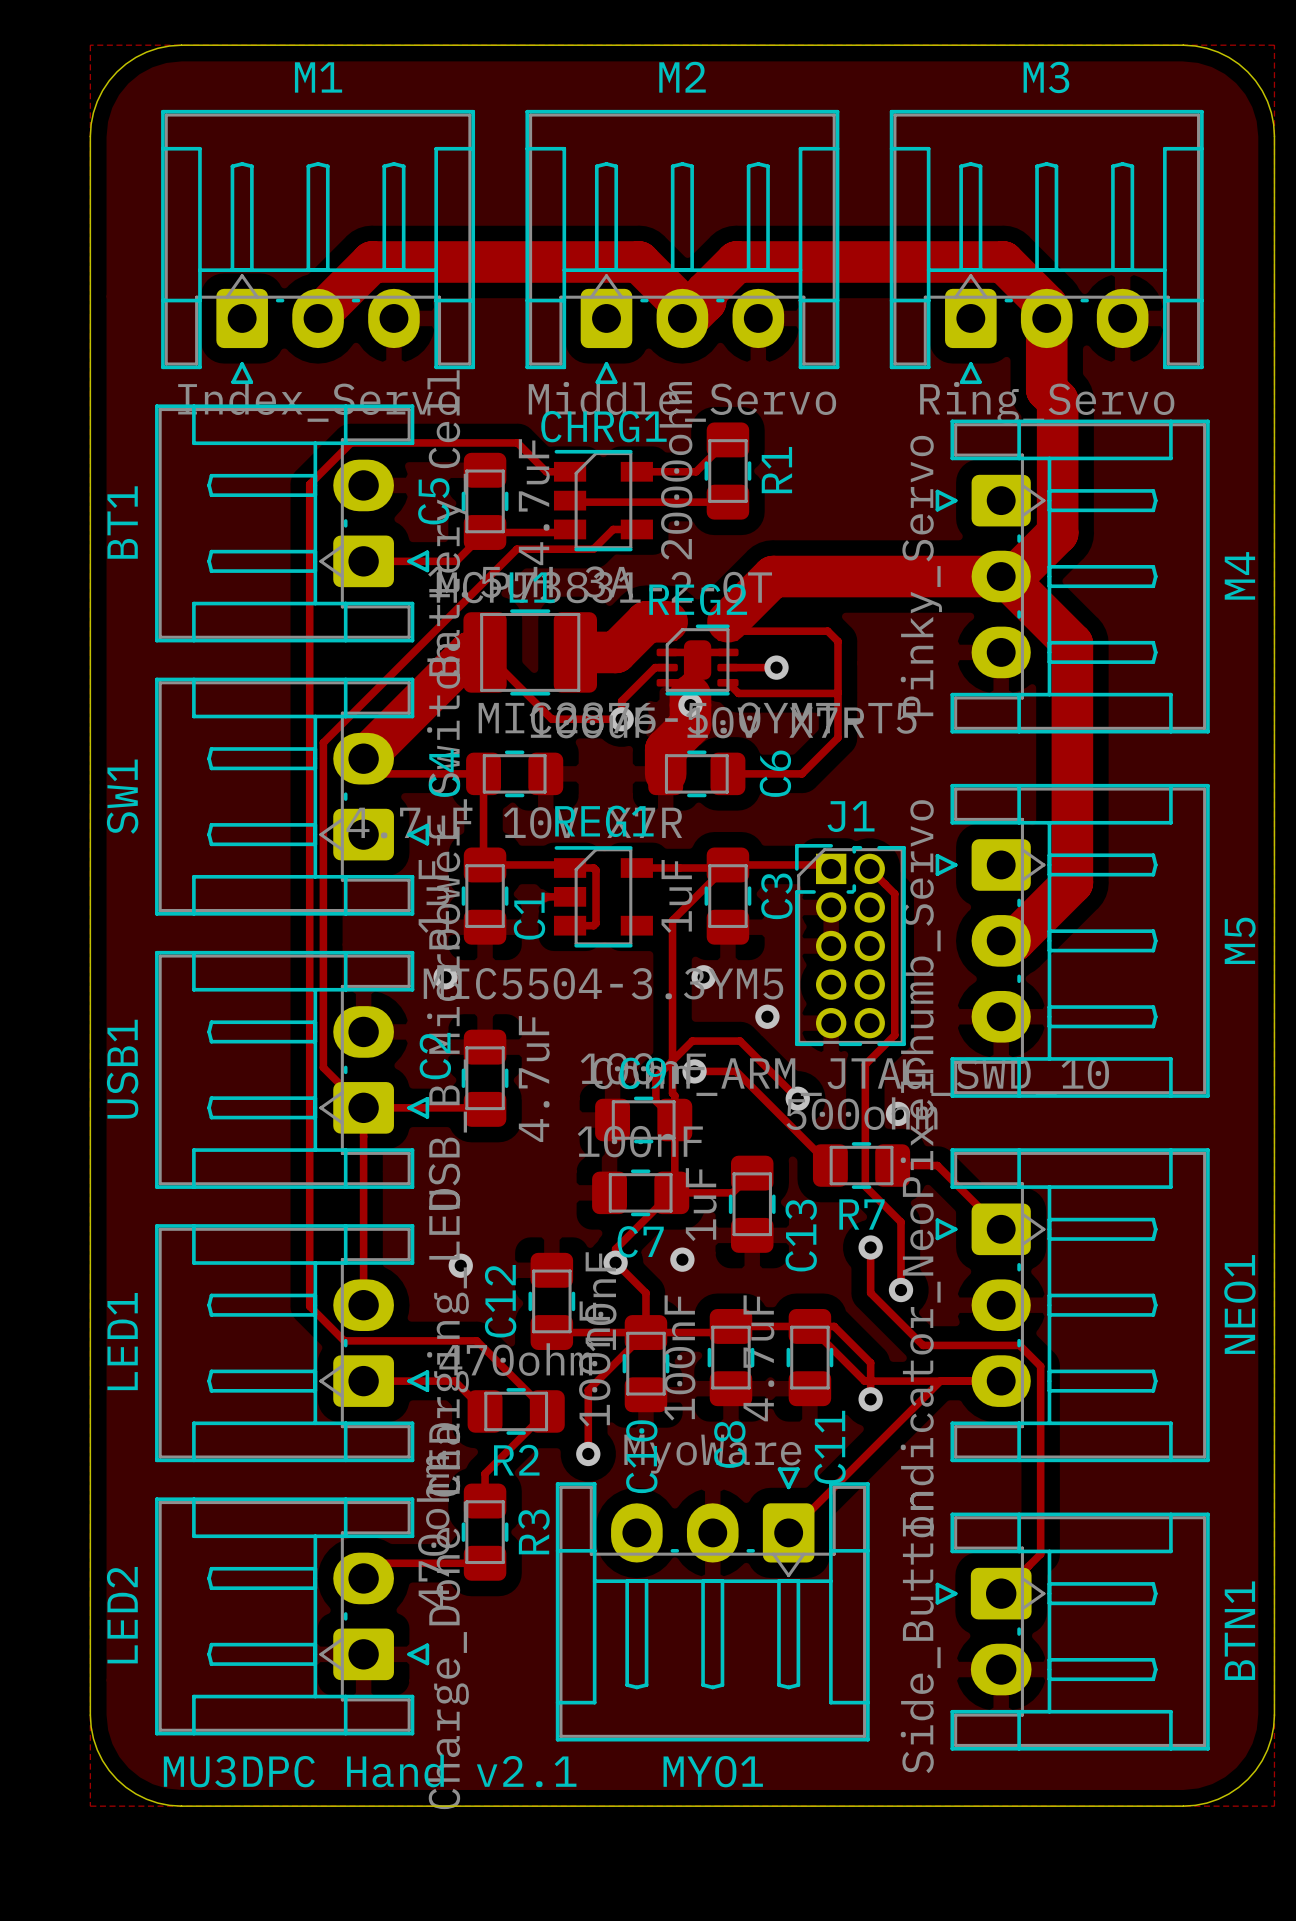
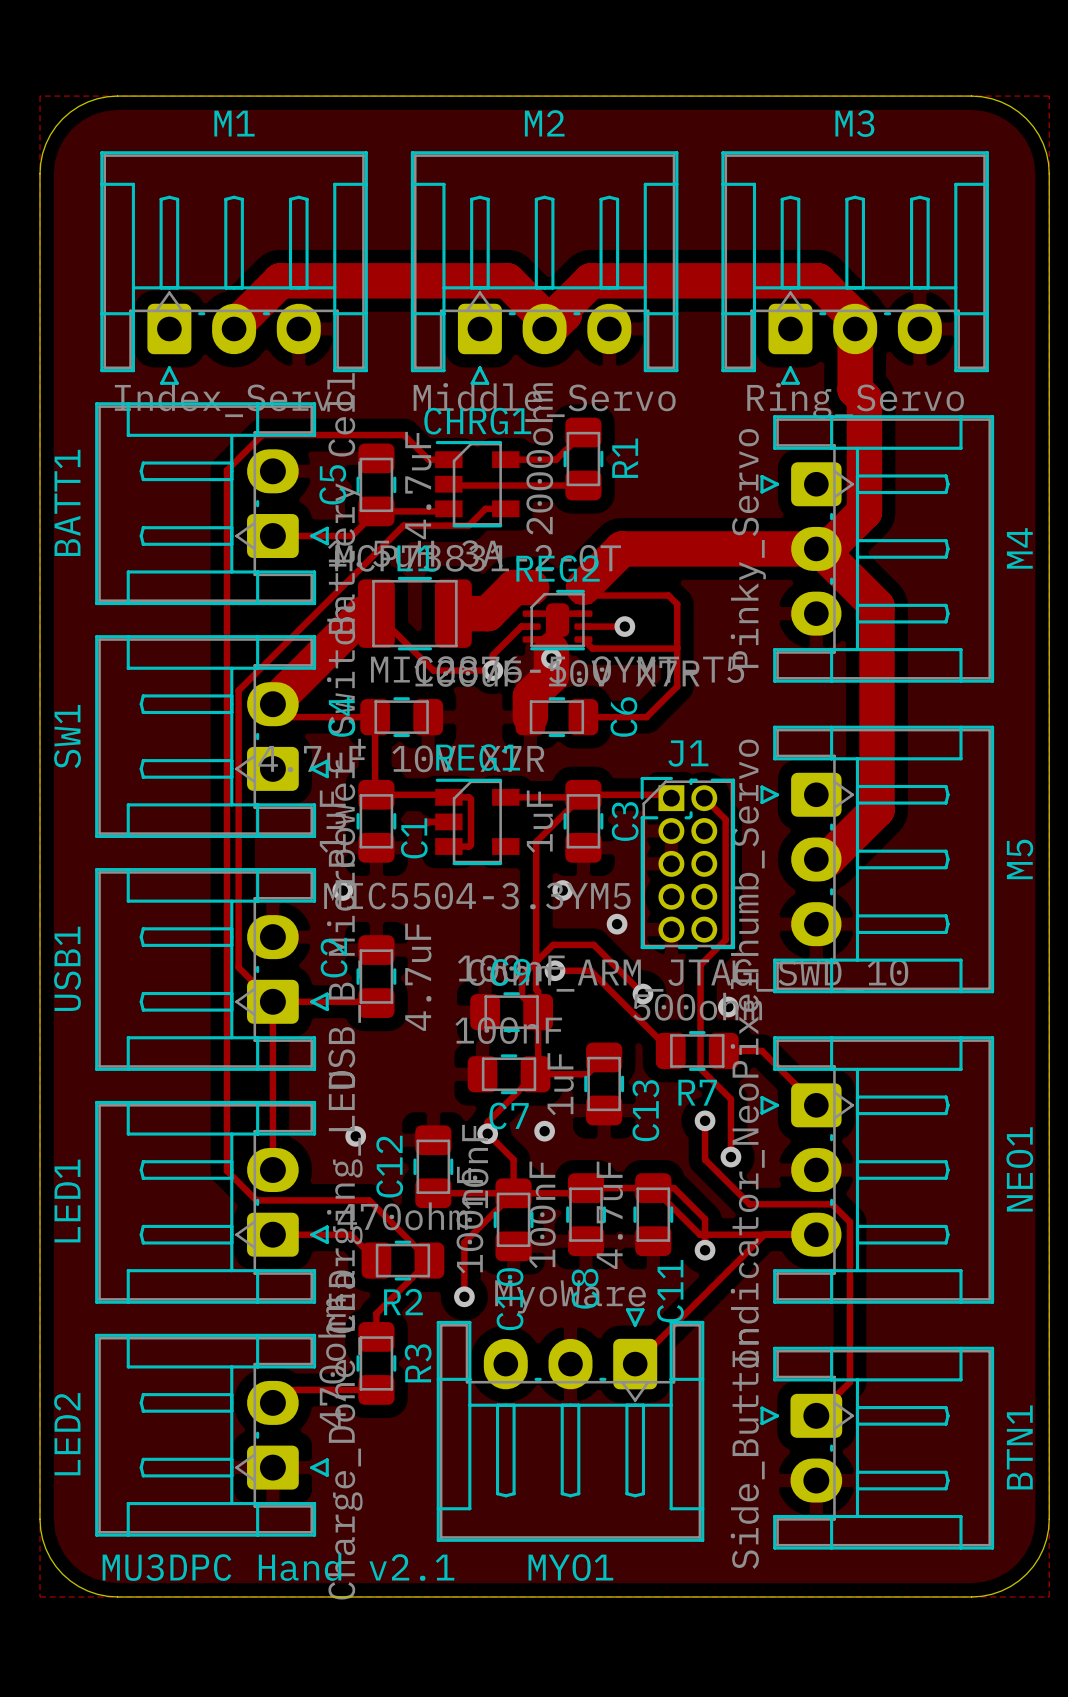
BT1 name: BT1 (122, 522) -> BATT1 (67, 502)

